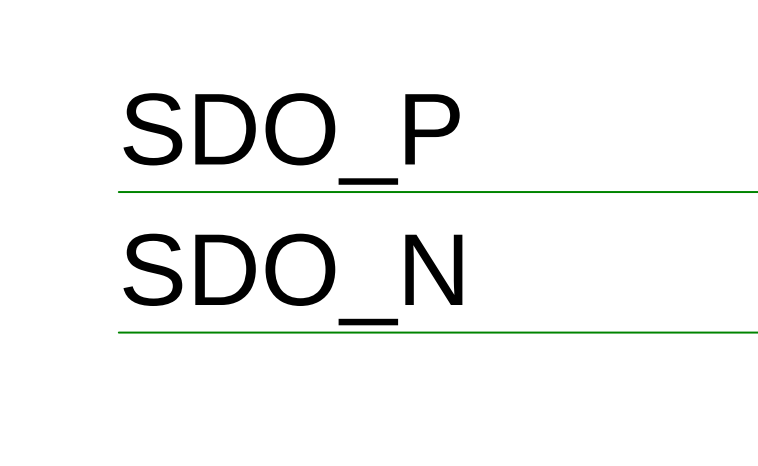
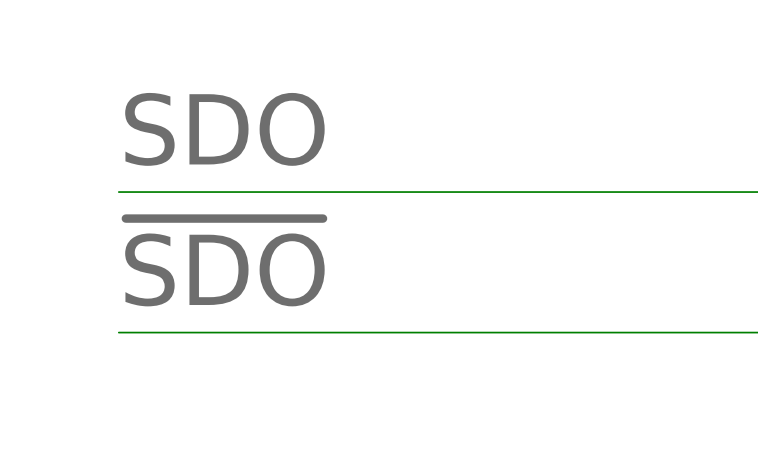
label: SDO_P (291, 138) -> SDO (224, 129)
label: SDO_N (292, 279) -> ~{SDO} (224, 262)

